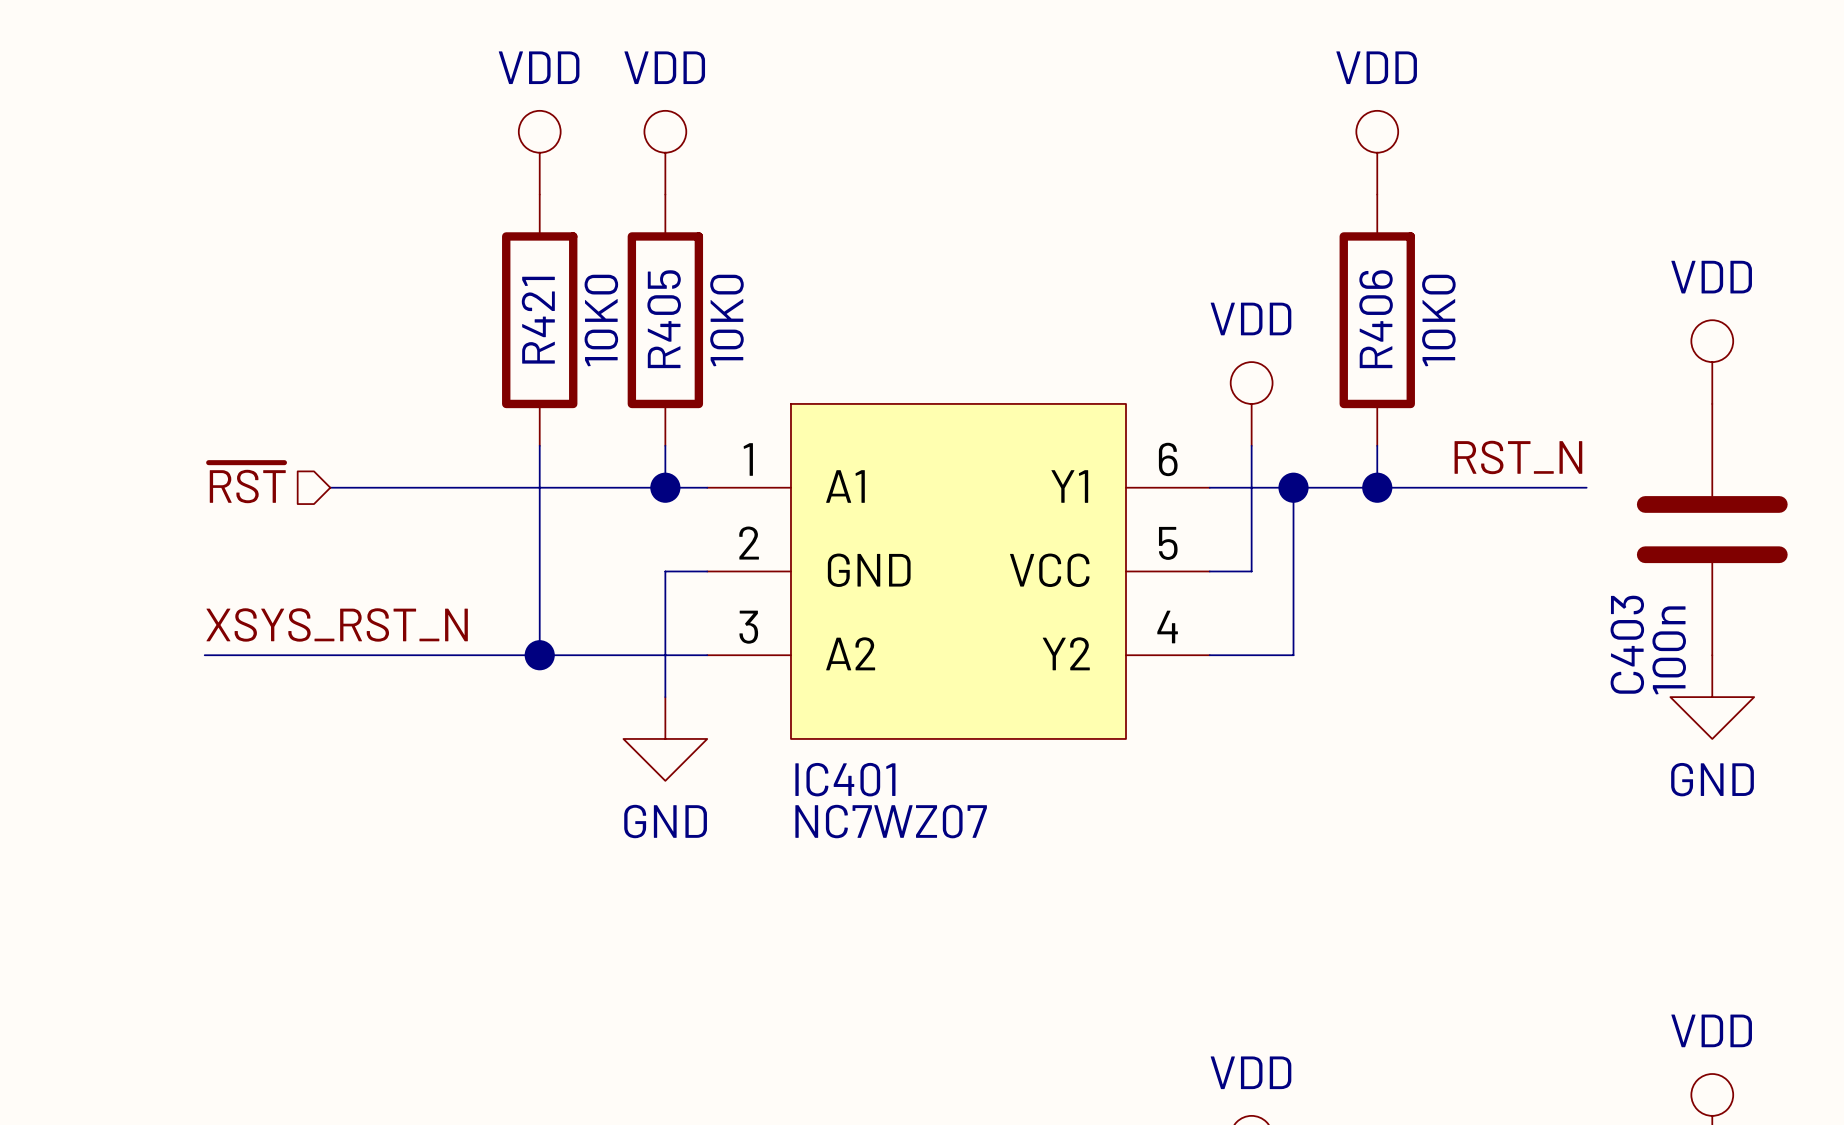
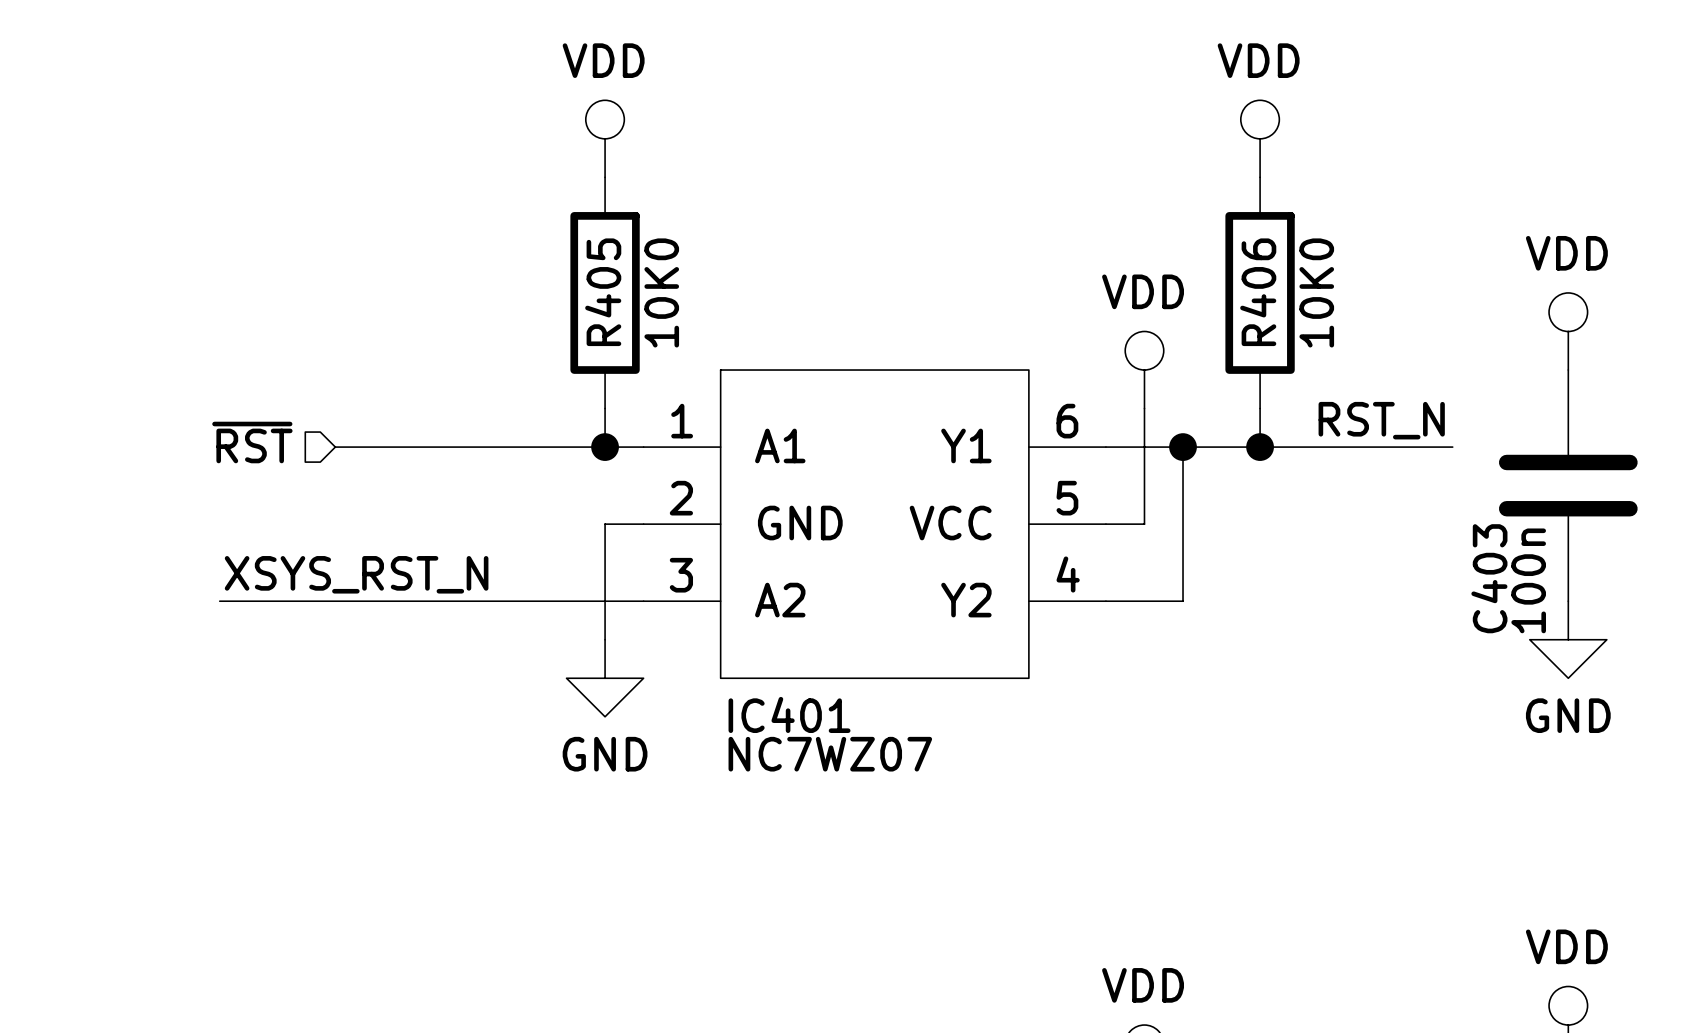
power symbol: VDD (539, 152) -> none
R421: (539, 320) -> none
wire: (539, 445) (539, 655) -> none
hierarchical label position: ~{RST} (247, 482) -> ~{RST} (252, 442)
wire: (330, 487) (372, 487) -> none
label position: XSYS_RST_N (337, 624) -> XSYS_RST_N (356, 574)
wire: (204, 655) (246, 655) -> none
junction: (539, 655) -> none

